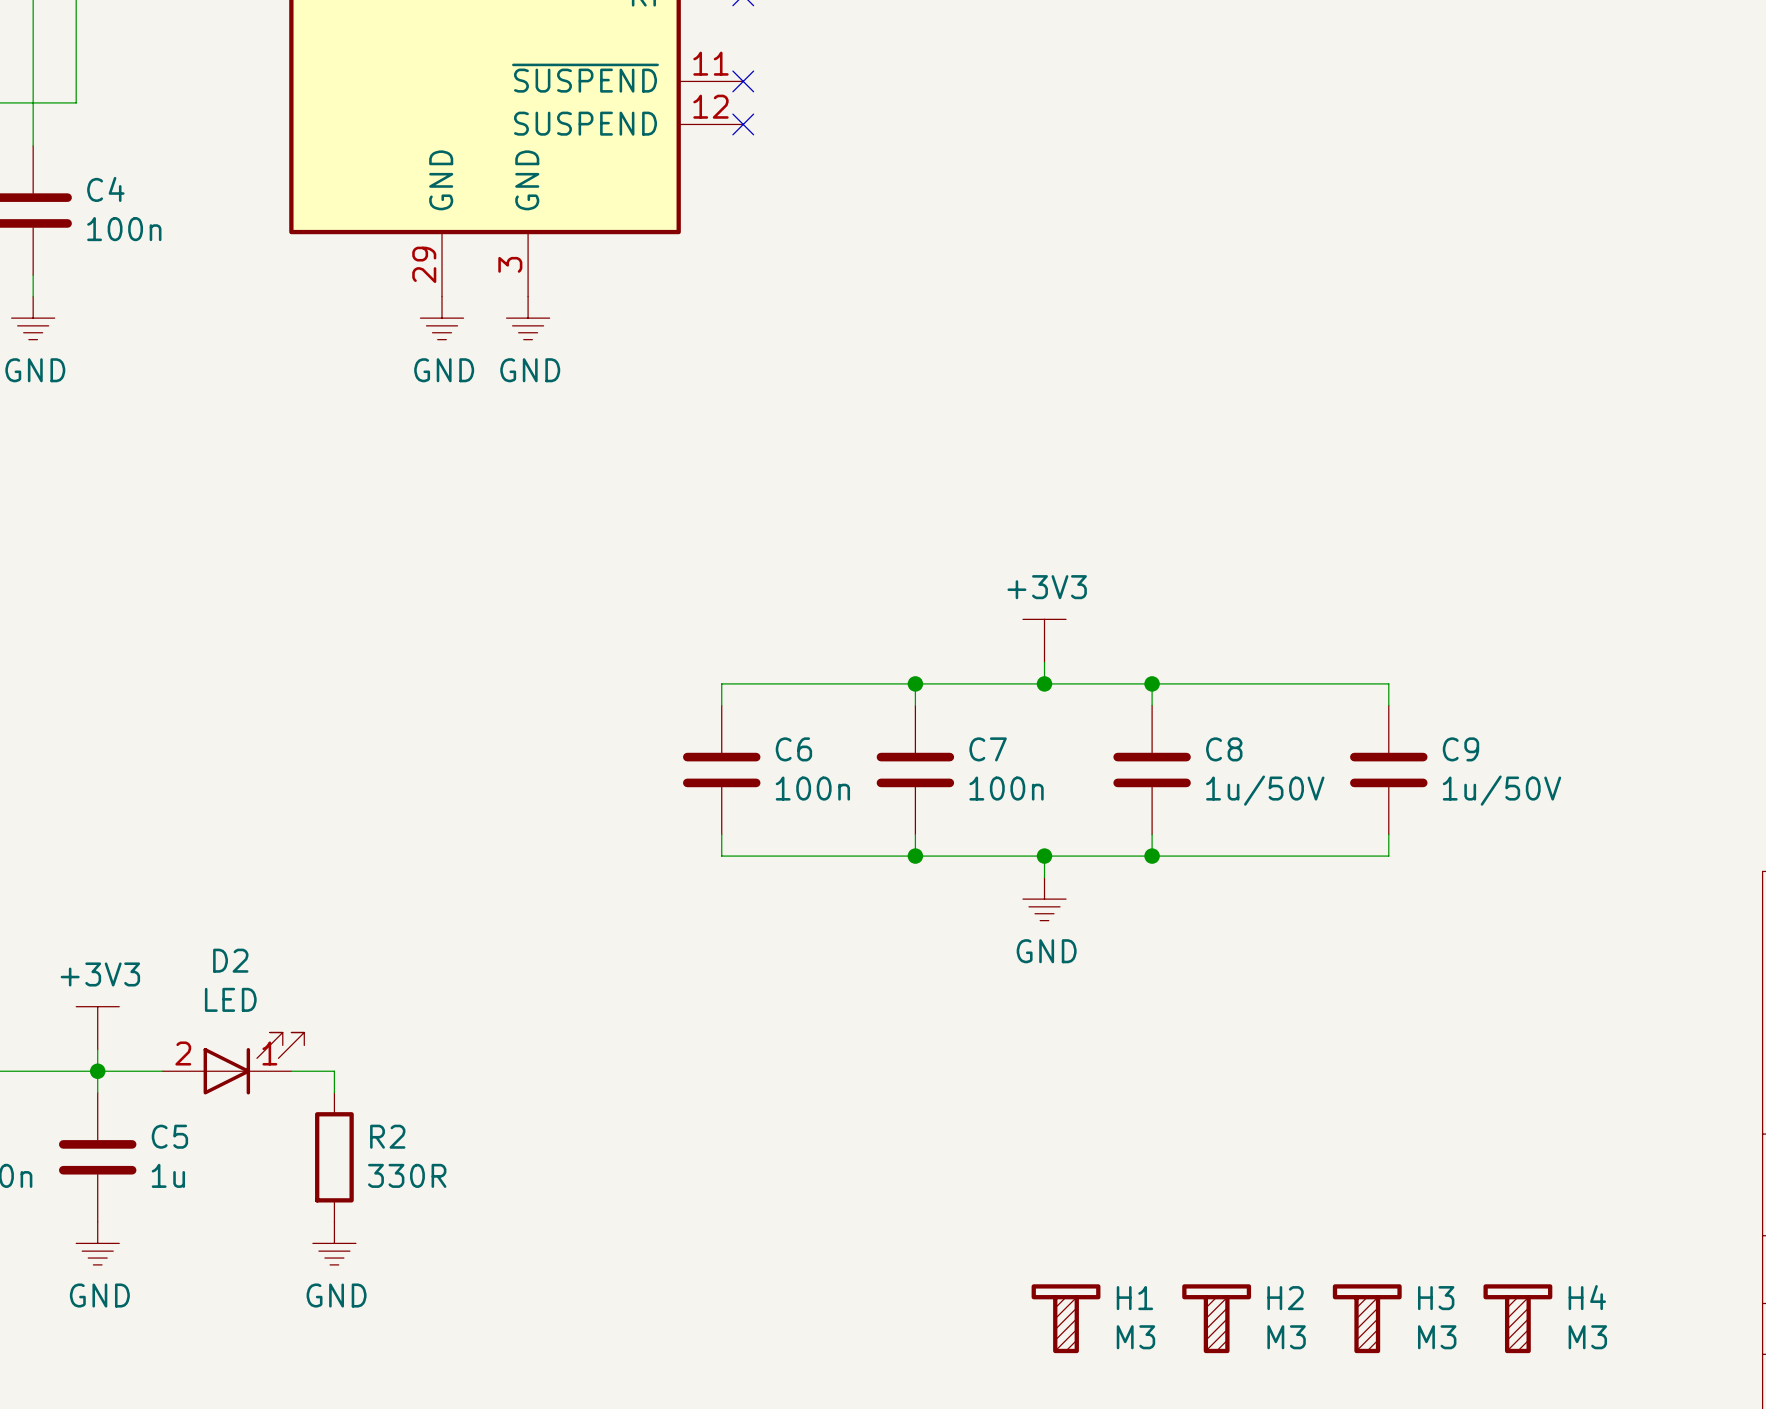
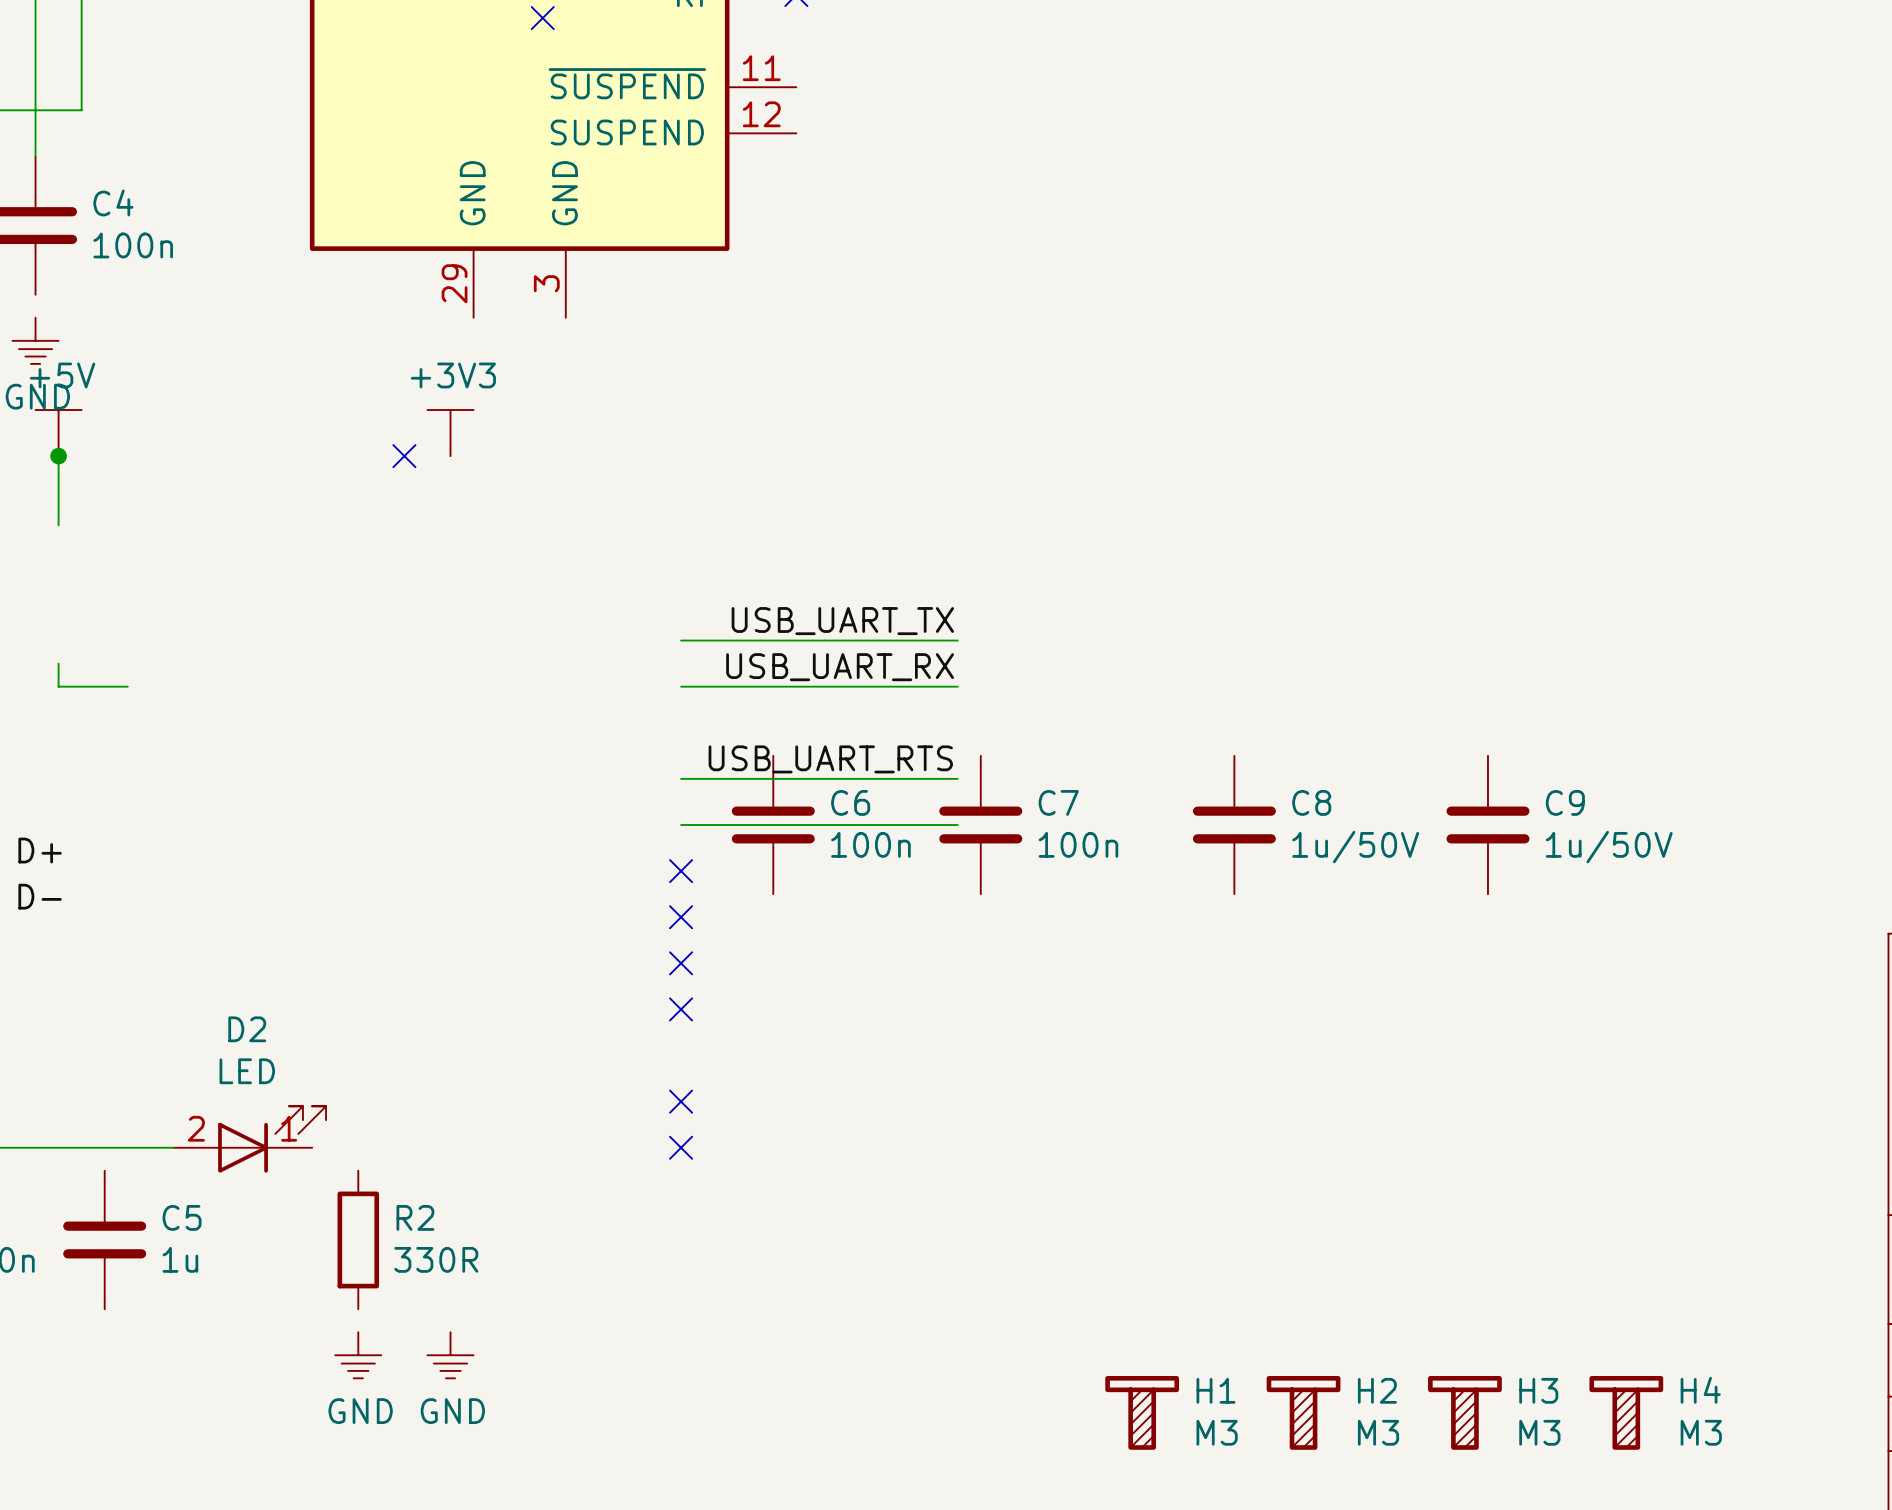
no-connect mark: none -> (542, 18)
no-connect mark: (743, 81) -> none
no-connect mark: (743, 124) -> none
wire: (33, 275) (33, 296) -> none
power symbol: GND (442, 318) -> none
power symbol: GND (528, 318) -> none
power symbol: none -> +5V (58, 433)
power symbol: none -> +3V3 (450, 433)
wire: none -> (58, 456) (58, 525)
junction: none -> (58, 456)
no-connect mark: none -> (404, 456)
label: none -> USB_UART_TX (842, 621)
wire: none -> (681, 640) (957, 640)
wire: none -> (58, 663) (58, 686) (127, 686)
label: none -> USB_UART_RX (840, 667)
wire: none -> (681, 686) (957, 686)
power symbol: +3V3 (1044, 640) -> none
wire: (1044, 662) (1044, 683) -> none
wire: (915, 683) (915, 705) -> none
junction: (915, 683) -> none
junction: (1044, 683) -> none
wire: (1152, 683) (1152, 705) -> none
junction: (1152, 683) -> none
wire: (721, 705) (721, 683) (1388, 683) (1388, 705) -> none
label: none -> USB_UART_RTS (830, 759)
wire: none -> (681, 778) (957, 778)
wire: none -> (681, 824) (957, 824)
label: none -> D+ (40, 850)
no-connect mark: none -> (681, 871)
wire: (721, 834) (721, 856) (1388, 856) (1388, 834) -> none
wire: (915, 834) (915, 856) -> none
wire: (1152, 834) (1152, 856) -> none
label: none -> D- (40, 896)
no-connect mark: none -> (681, 917)
junction: (915, 856) -> none
wire: (1044, 856) (1044, 877) -> none
junction: (1044, 856) -> none
junction: (1152, 856) -> none
no-connect mark: none -> (681, 963)
power symbol: GND (1044, 899) -> none
no-connect mark: none -> (681, 1009)
power symbol: +3V3 (97, 1028) -> none
no-connect mark: none -> (681, 1101)
wire: (97, 1049) (97, 1092) -> none
junction: (97, 1071) -> none
wire: (291, 1071) (334, 1071) (334, 1092) -> none
no-connect mark: none -> (681, 1147)
power symbol: GND (97, 1243) -> none
power symbol position: GND (334, 1243) -> GND (358, 1355)
power symbol: none -> GND (450, 1355)

